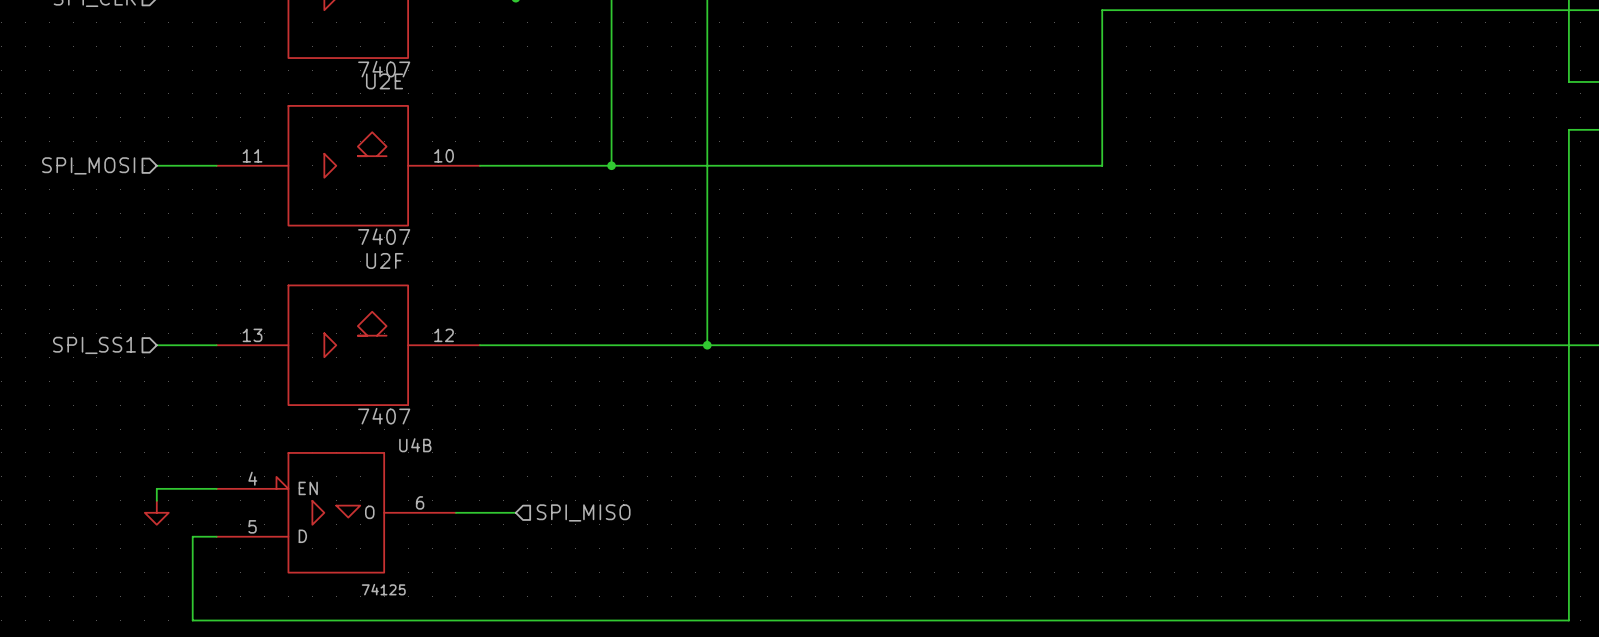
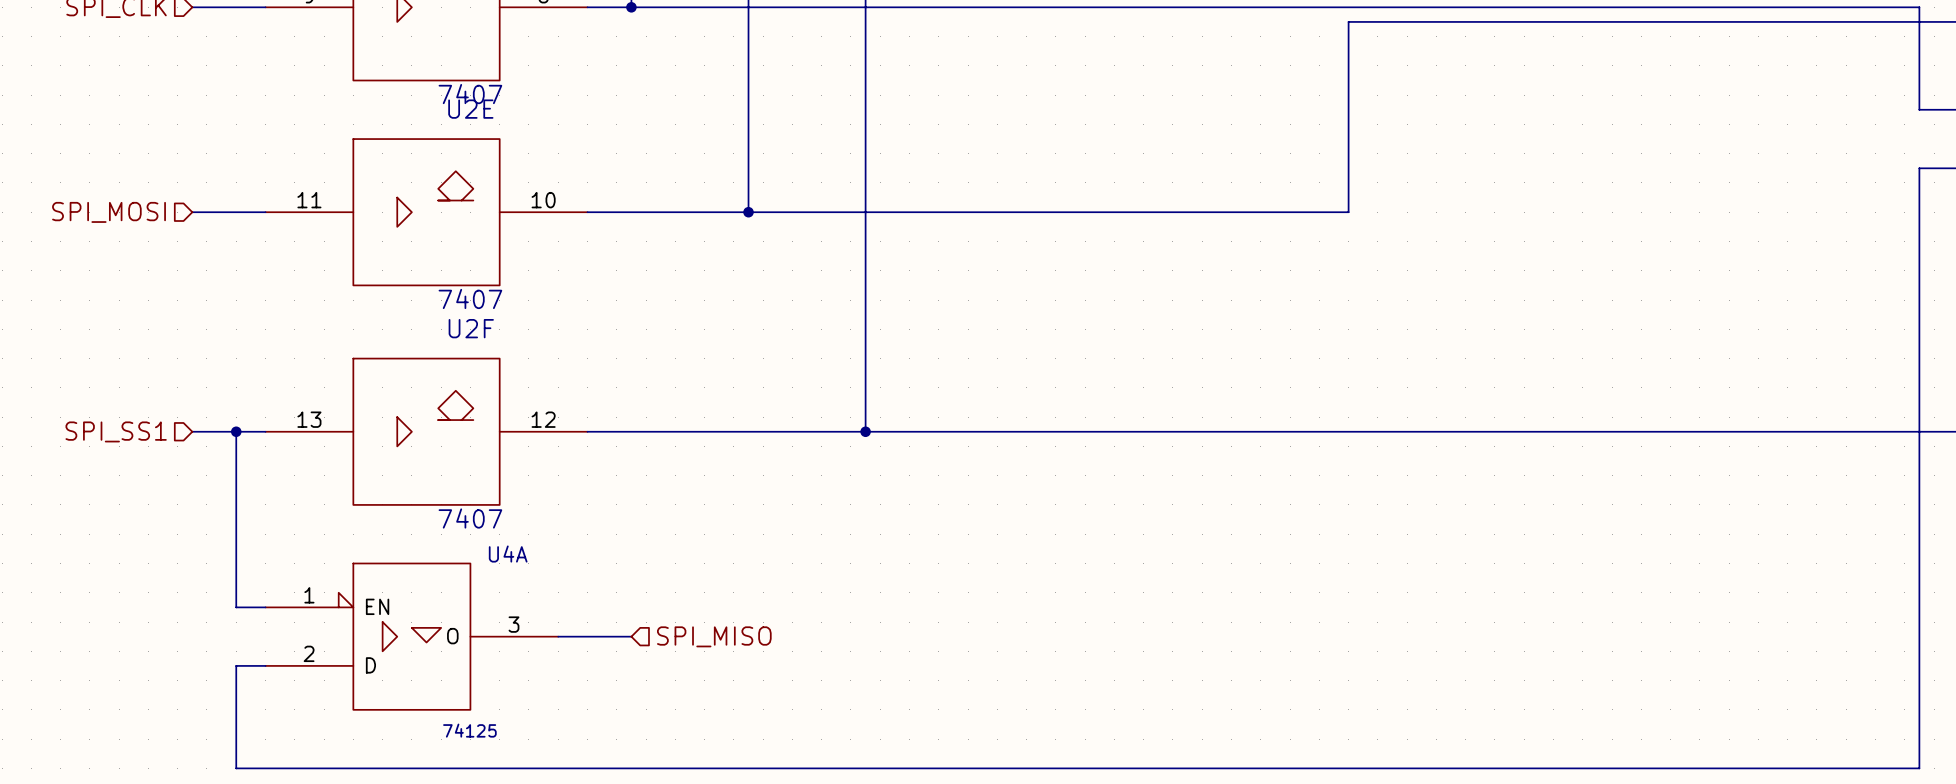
junction: none -> (236, 431)
U4B name: U4B (415, 445) -> U4A (508, 554)
U4B pin number: 4 (252, 478) -> 1 (309, 595)
wire: (192, 488) (156, 488) (156, 500) -> (236, 607) (236, 431)
U4B pin number: 6 (420, 502) -> 3 (513, 624)
power symbol: (156, 512) -> none
U4B pin number: 5 (252, 526) -> 2 (309, 653)

